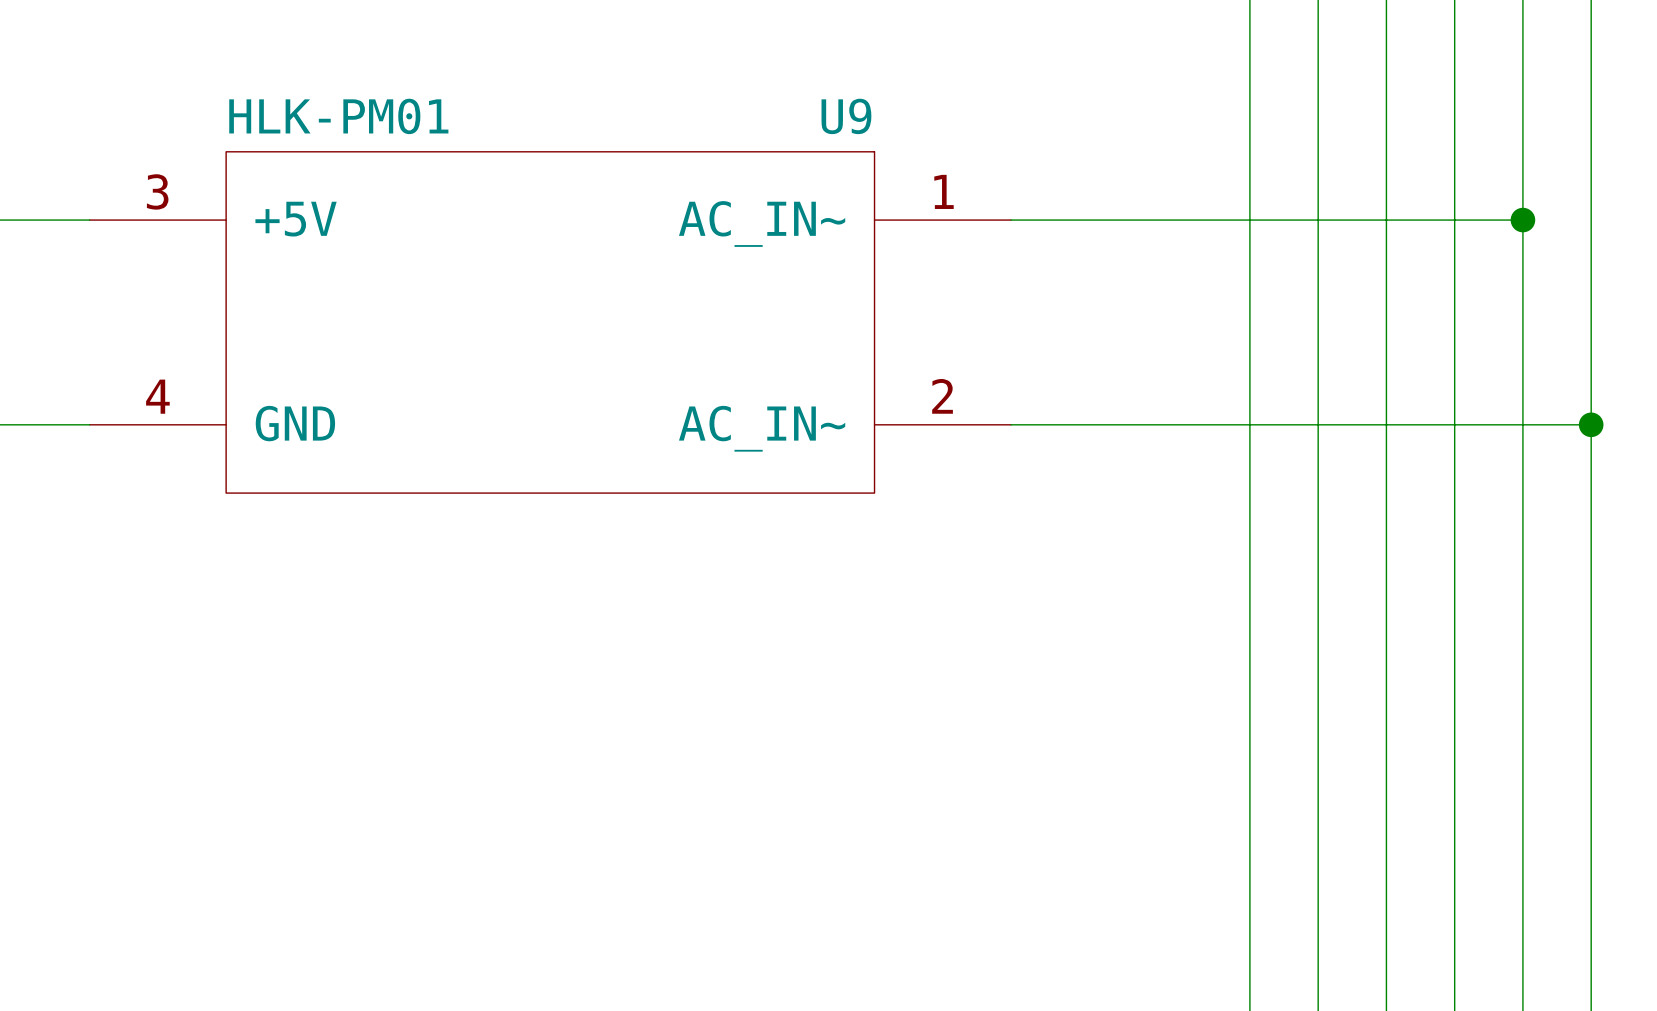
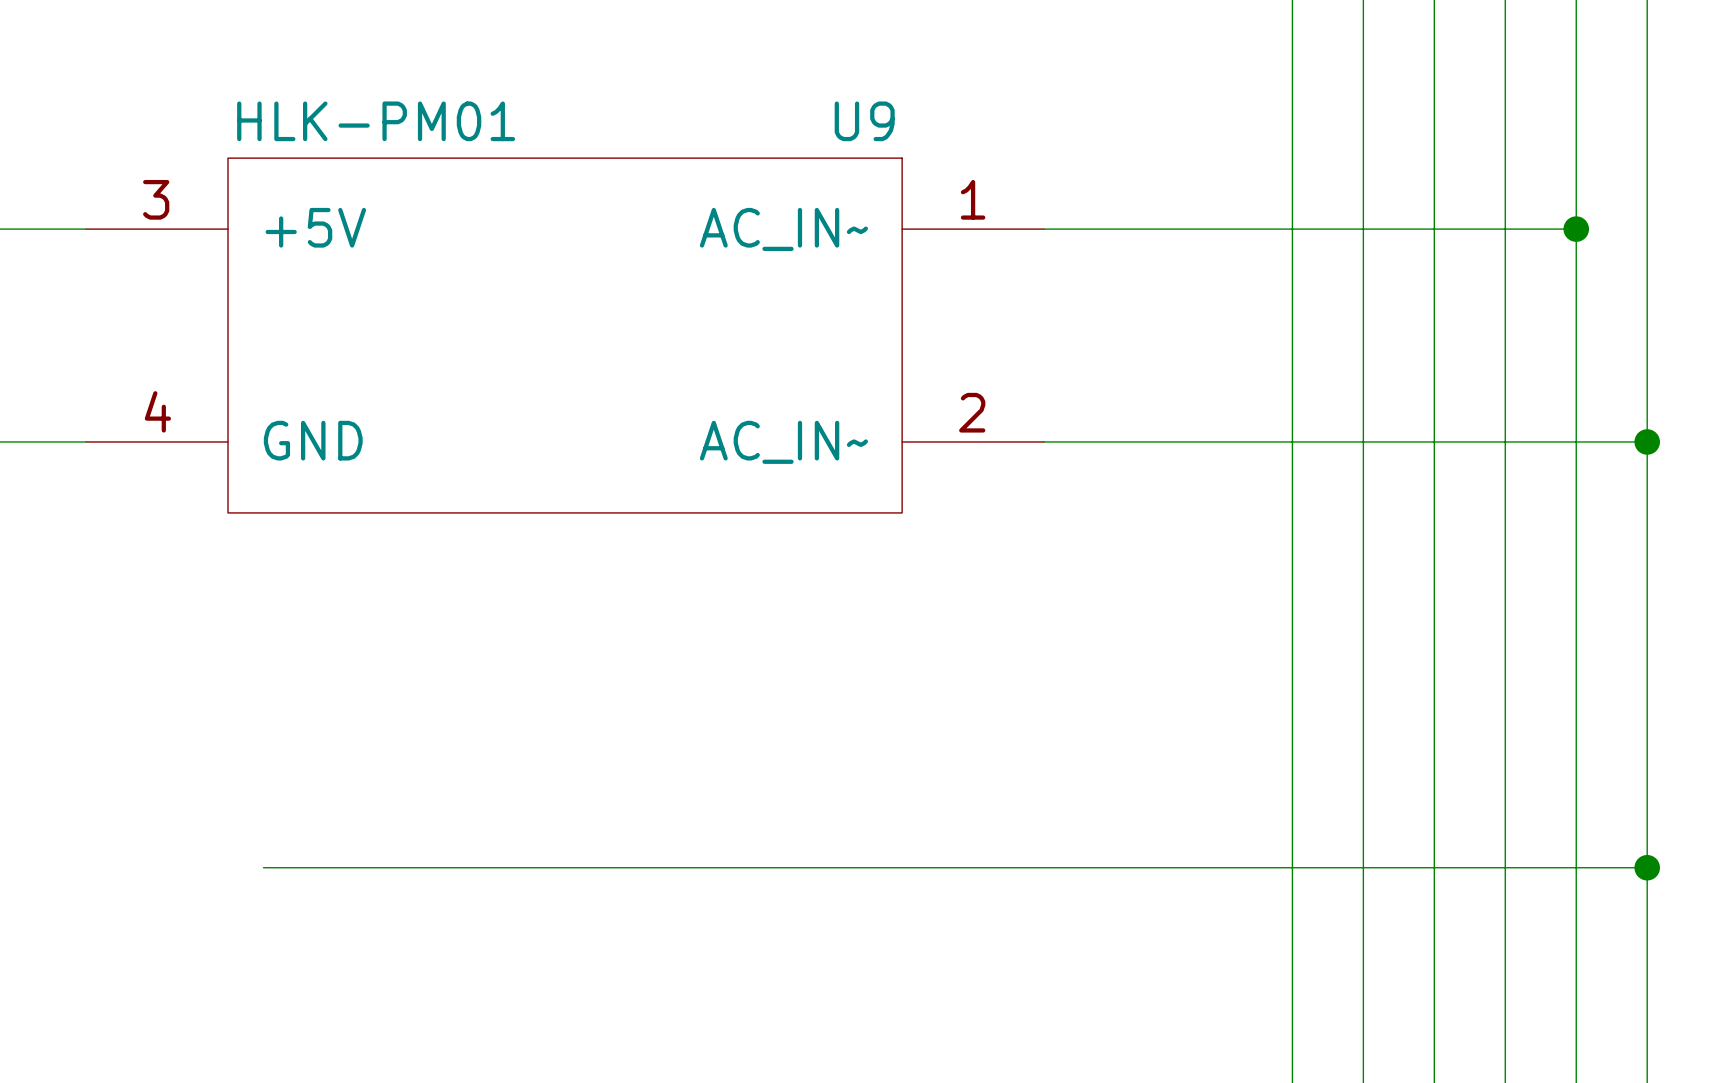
wire: none -> (263, 867) (1647, 867)
junction: none -> (1647, 867)

